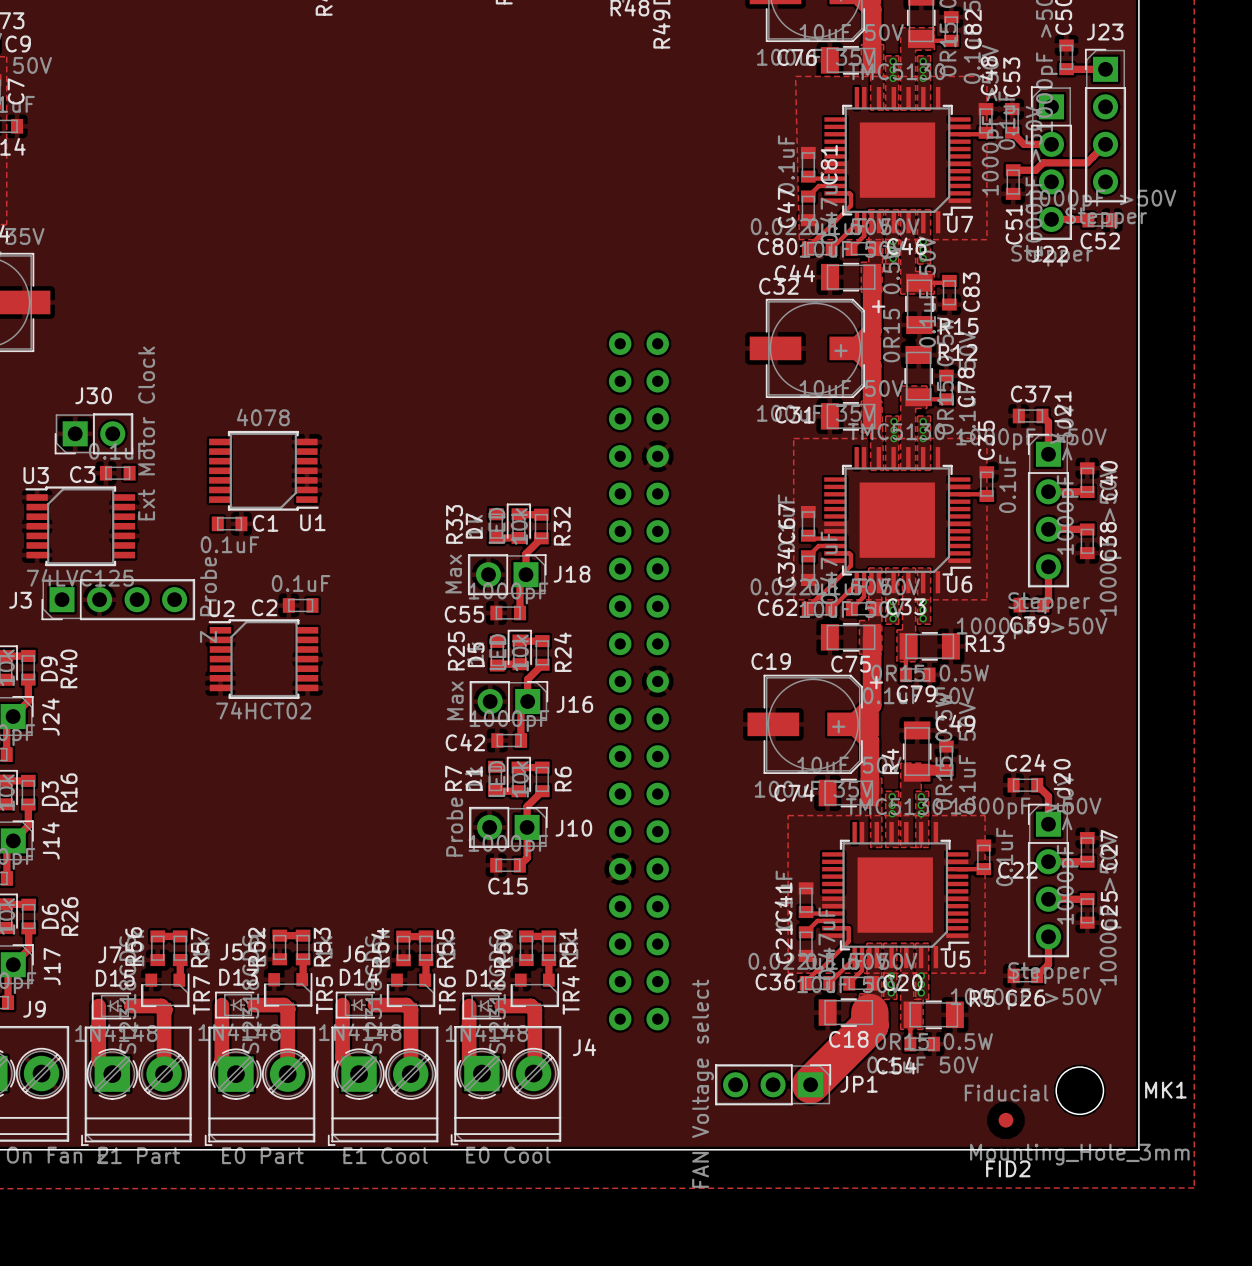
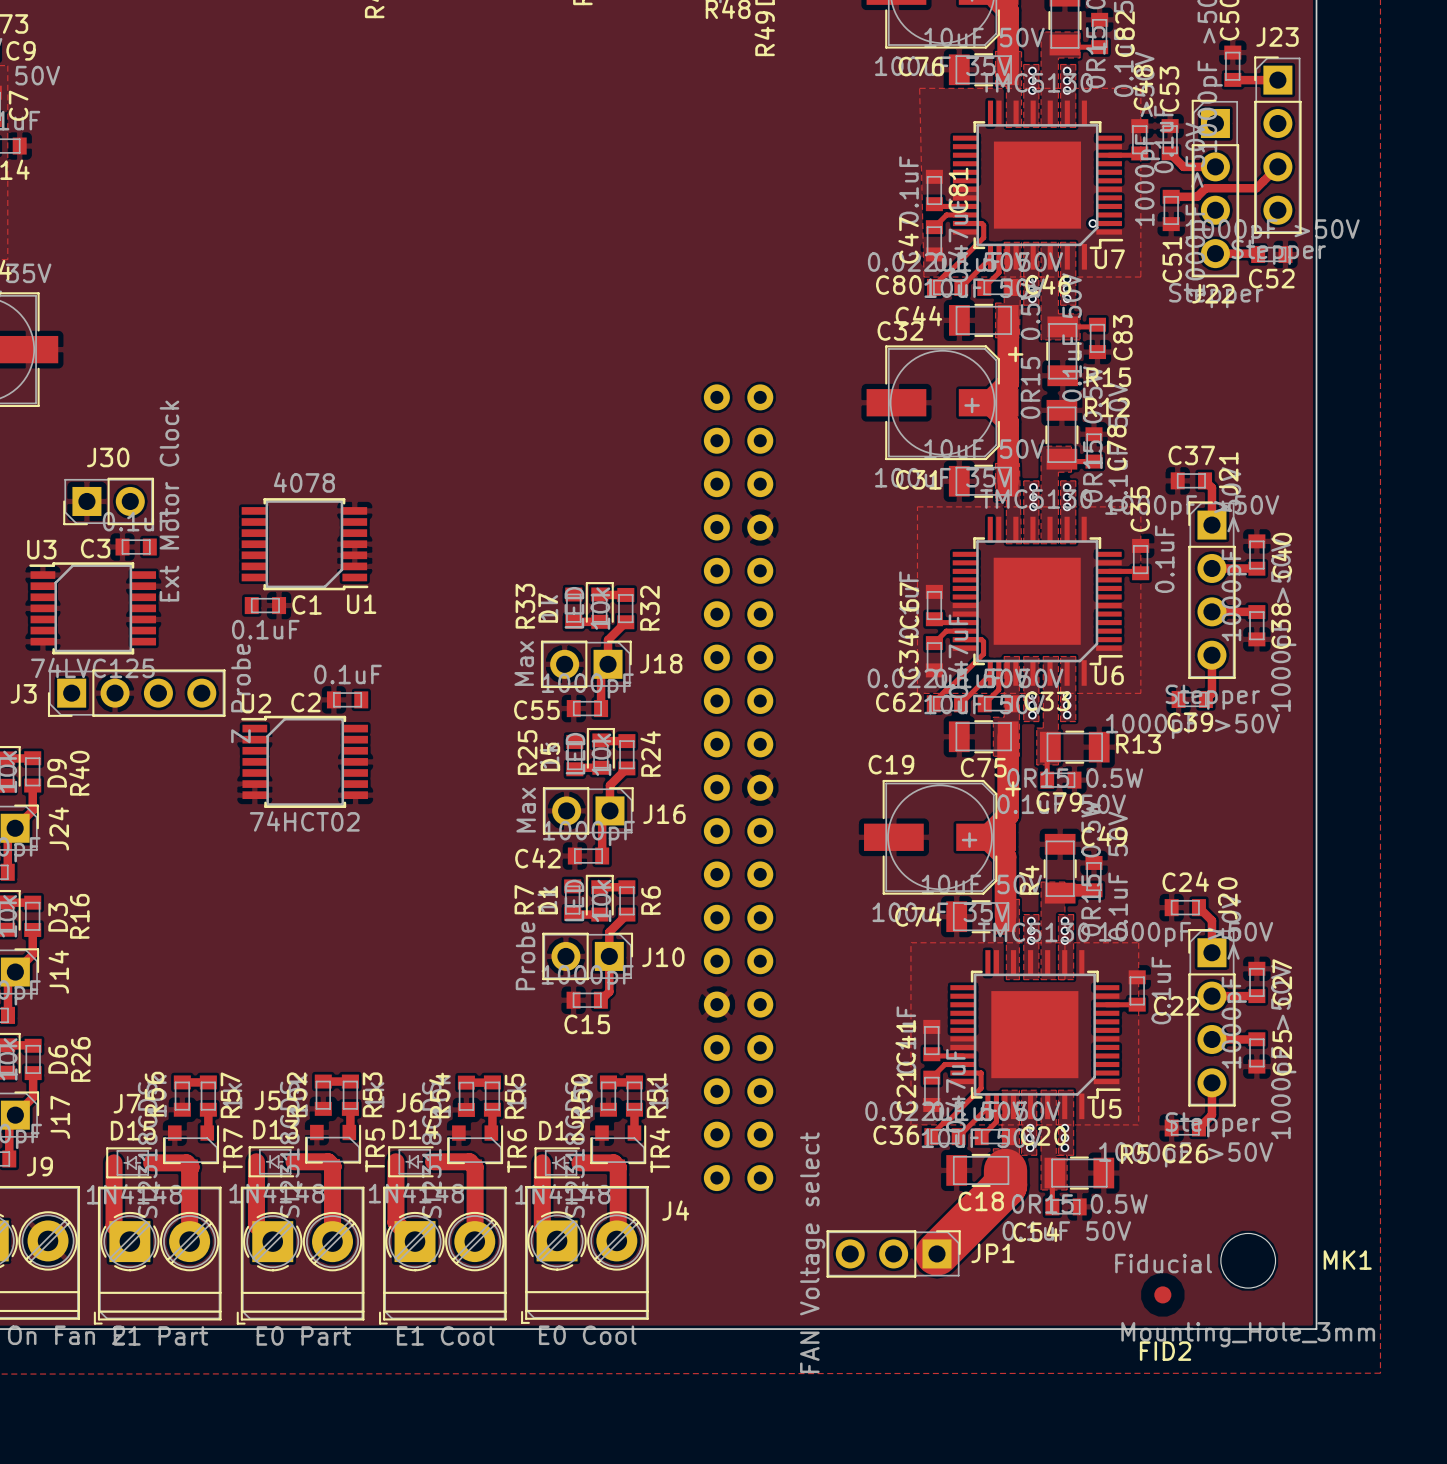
via: none -> (1092, 223)

